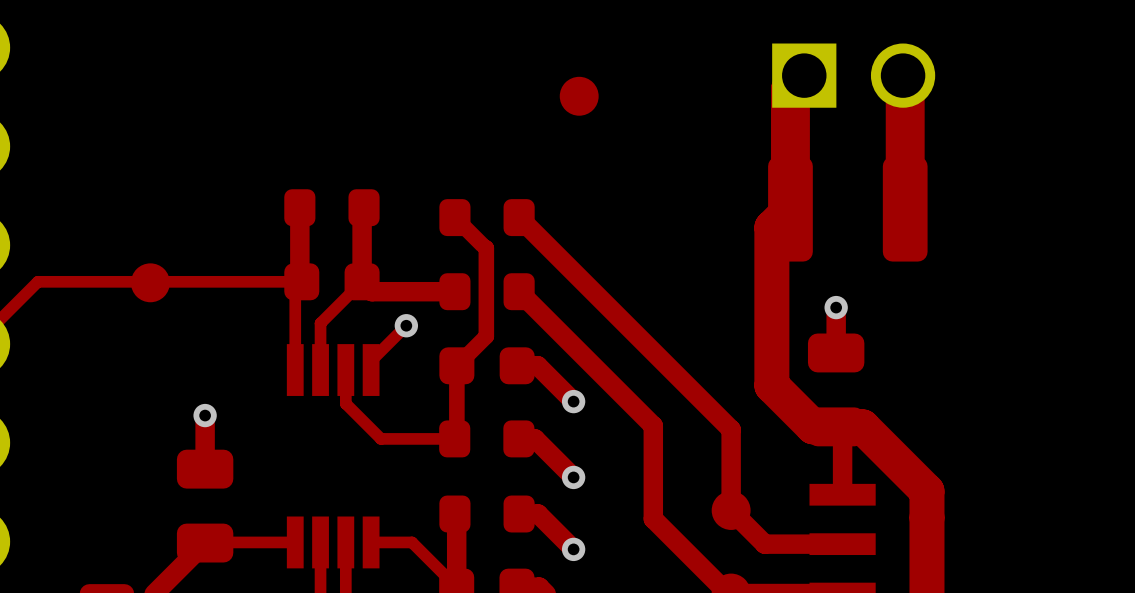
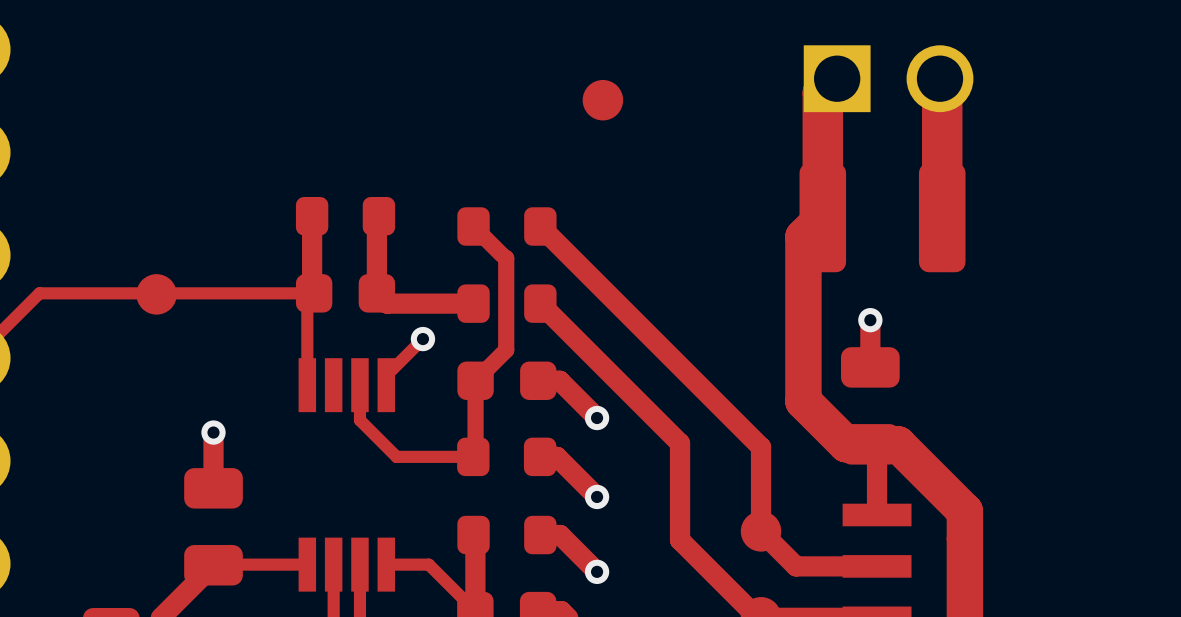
top track: (362, 281) (320, 323) (320, 370) -> none

